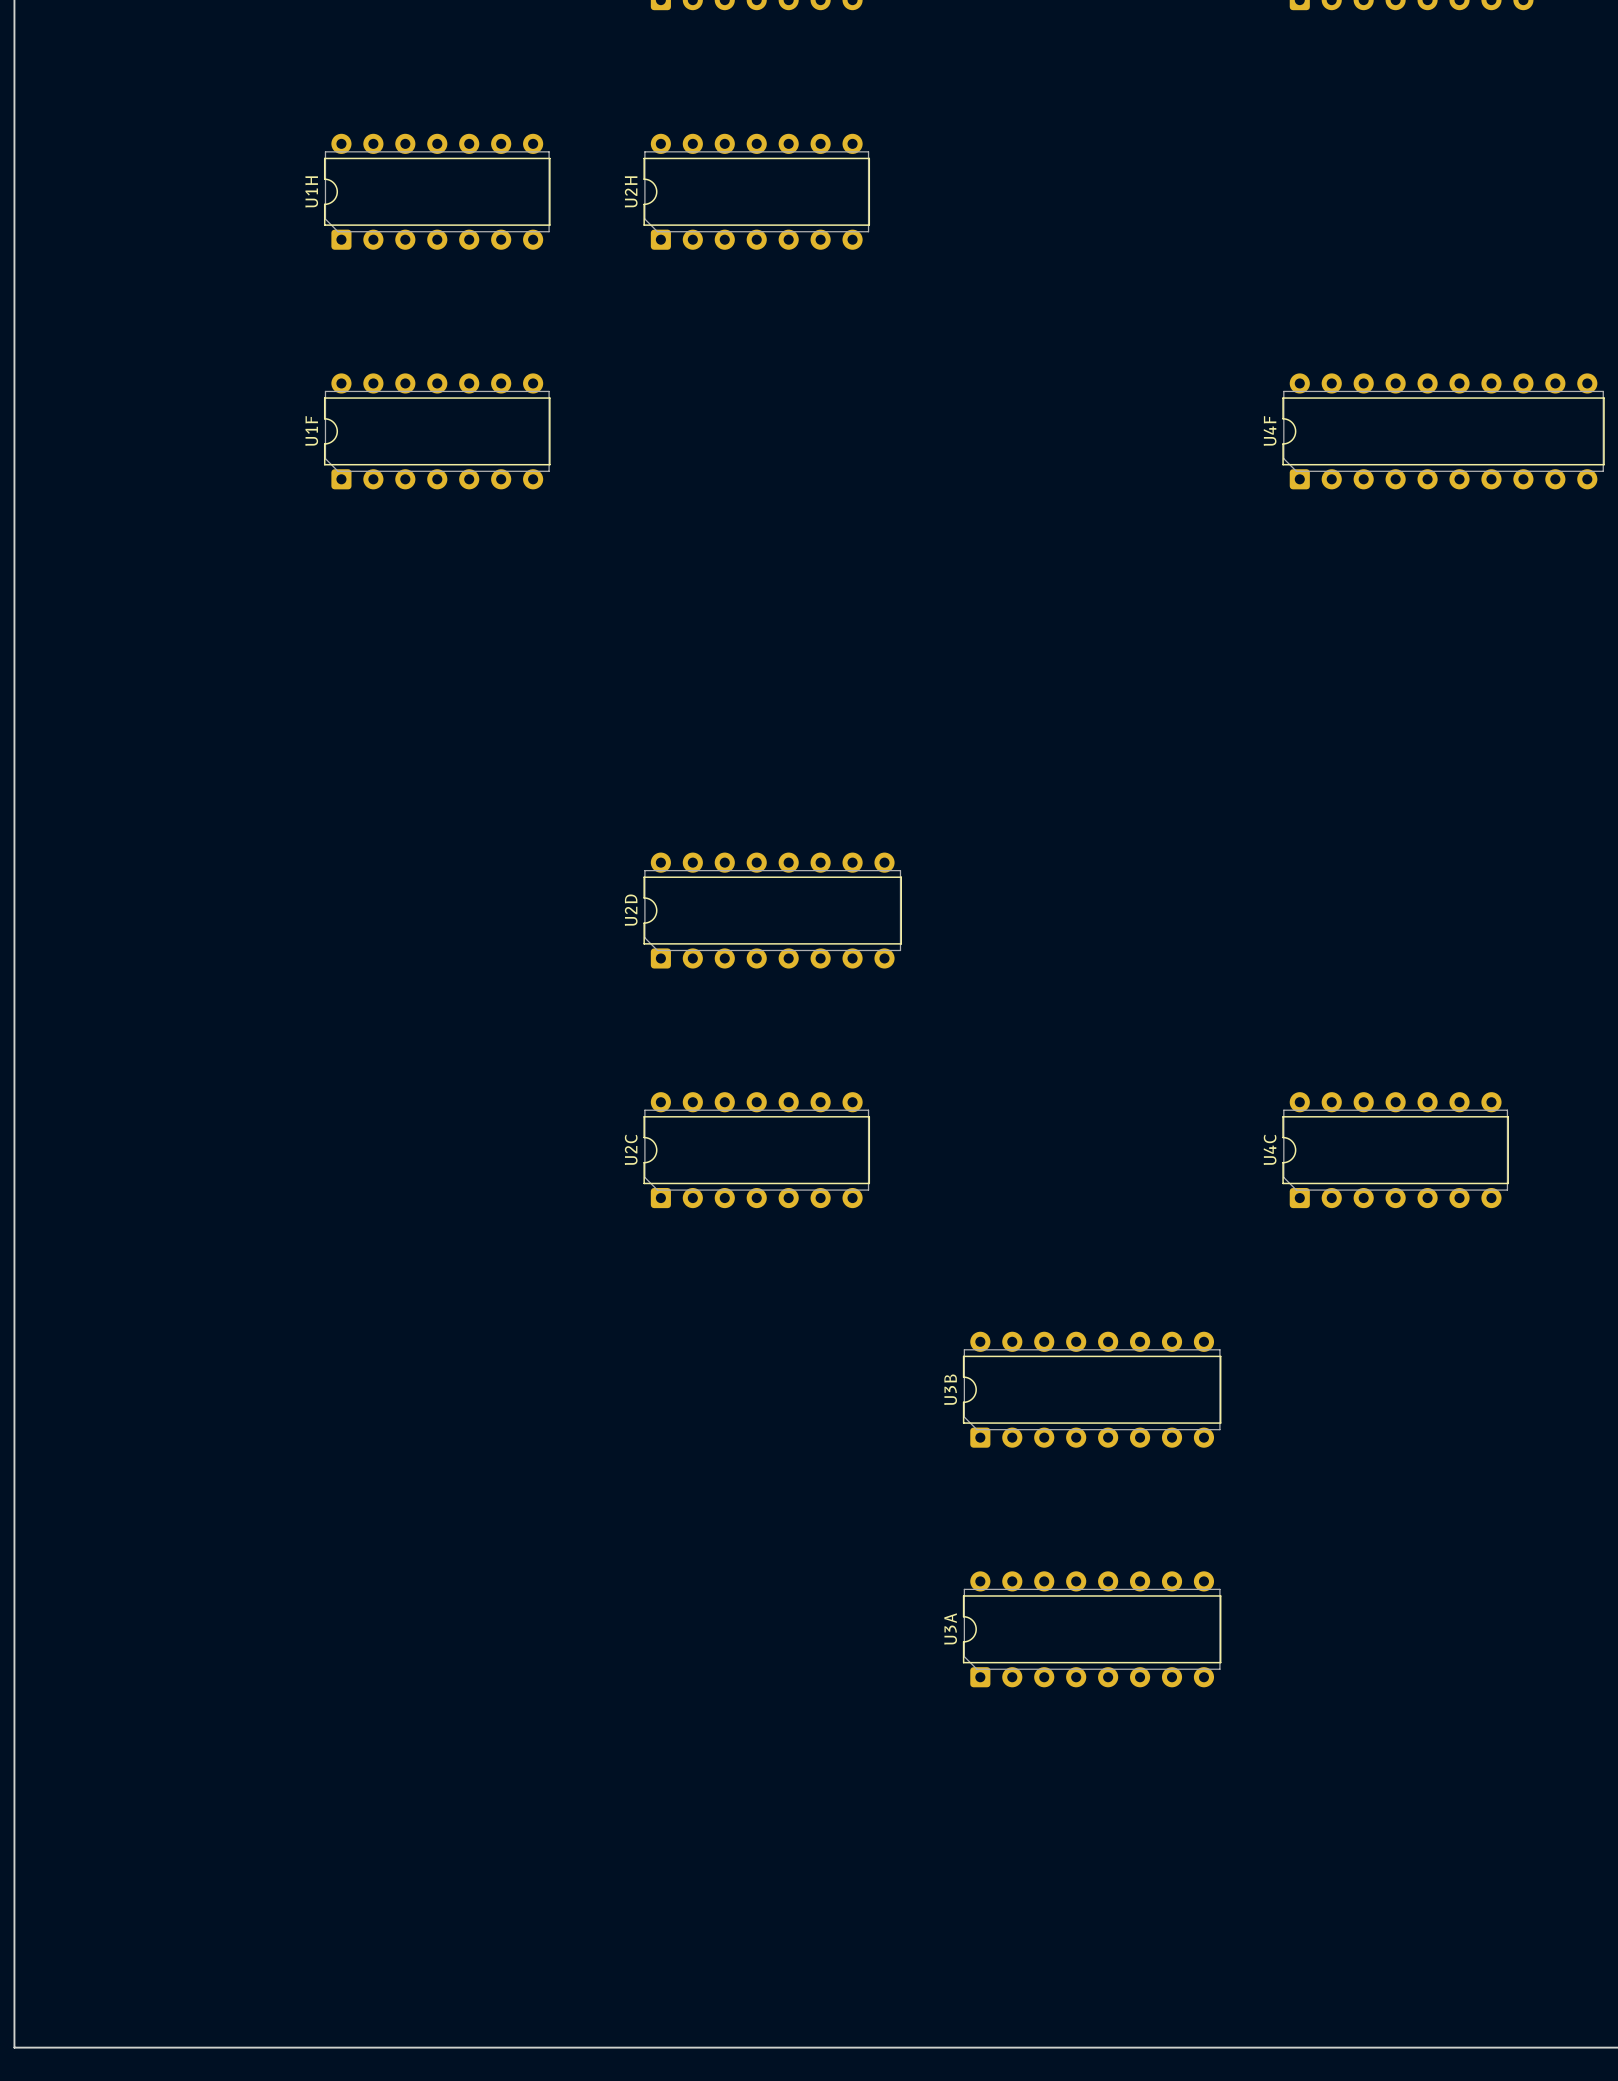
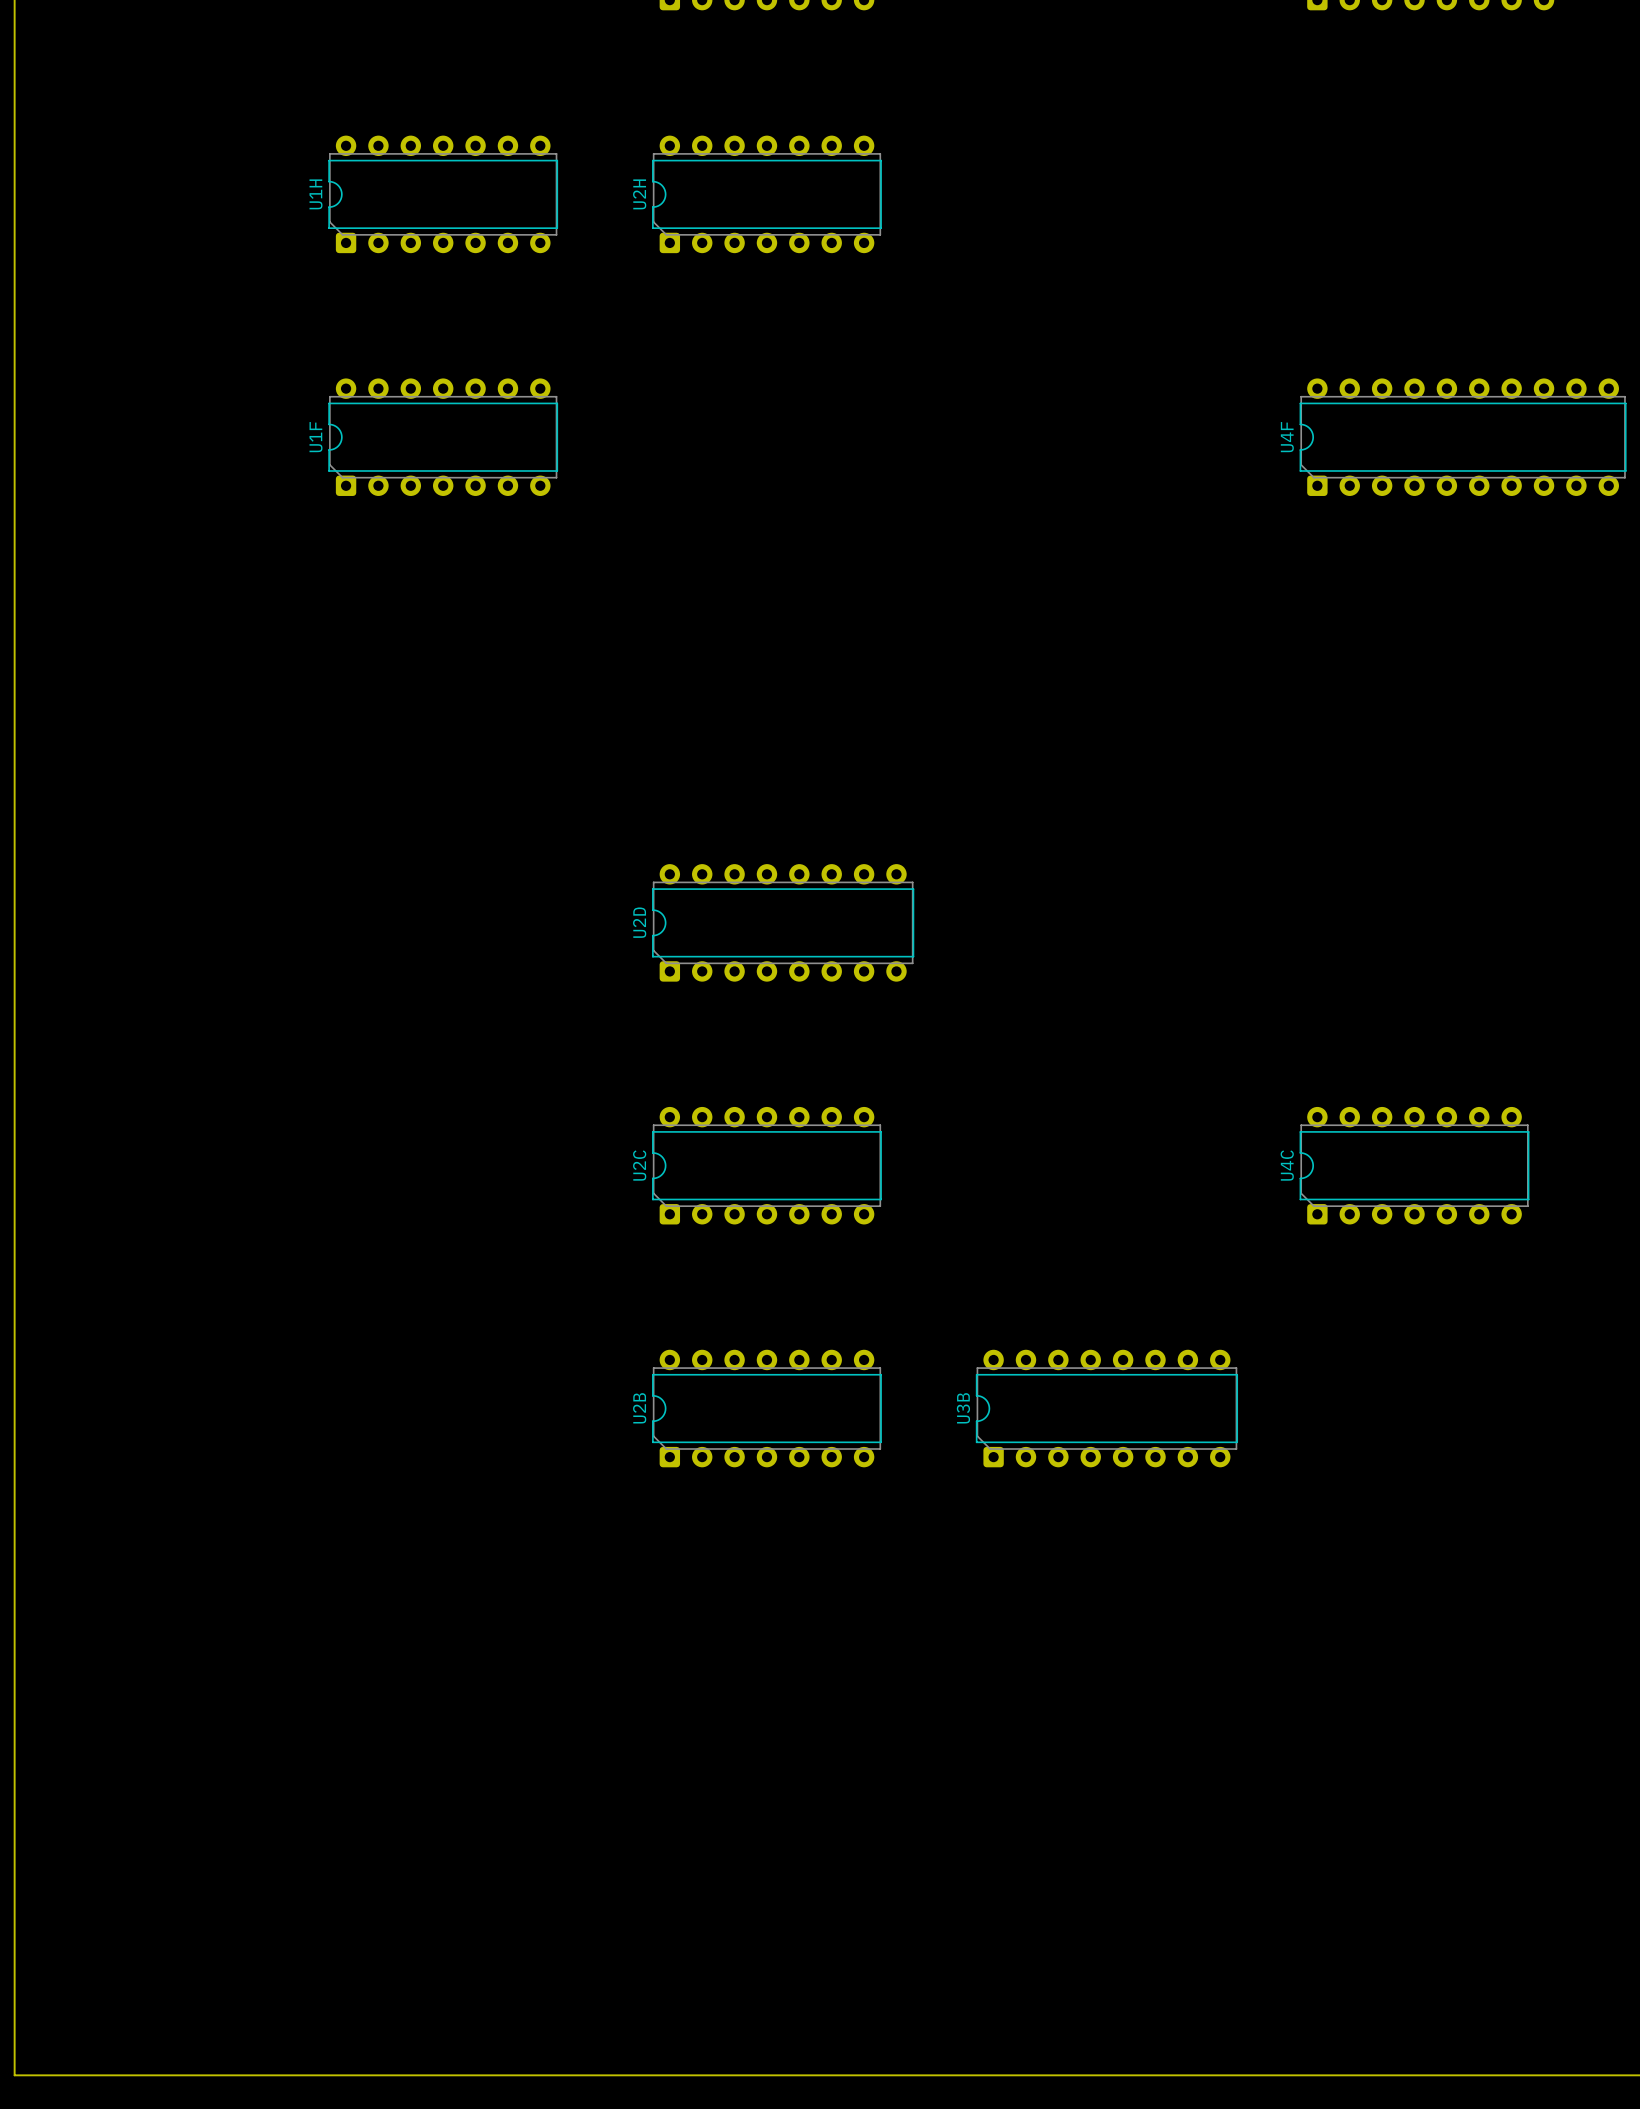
U2B: none -> (766, 1408)
U3A: (1092, 1629) -> none

